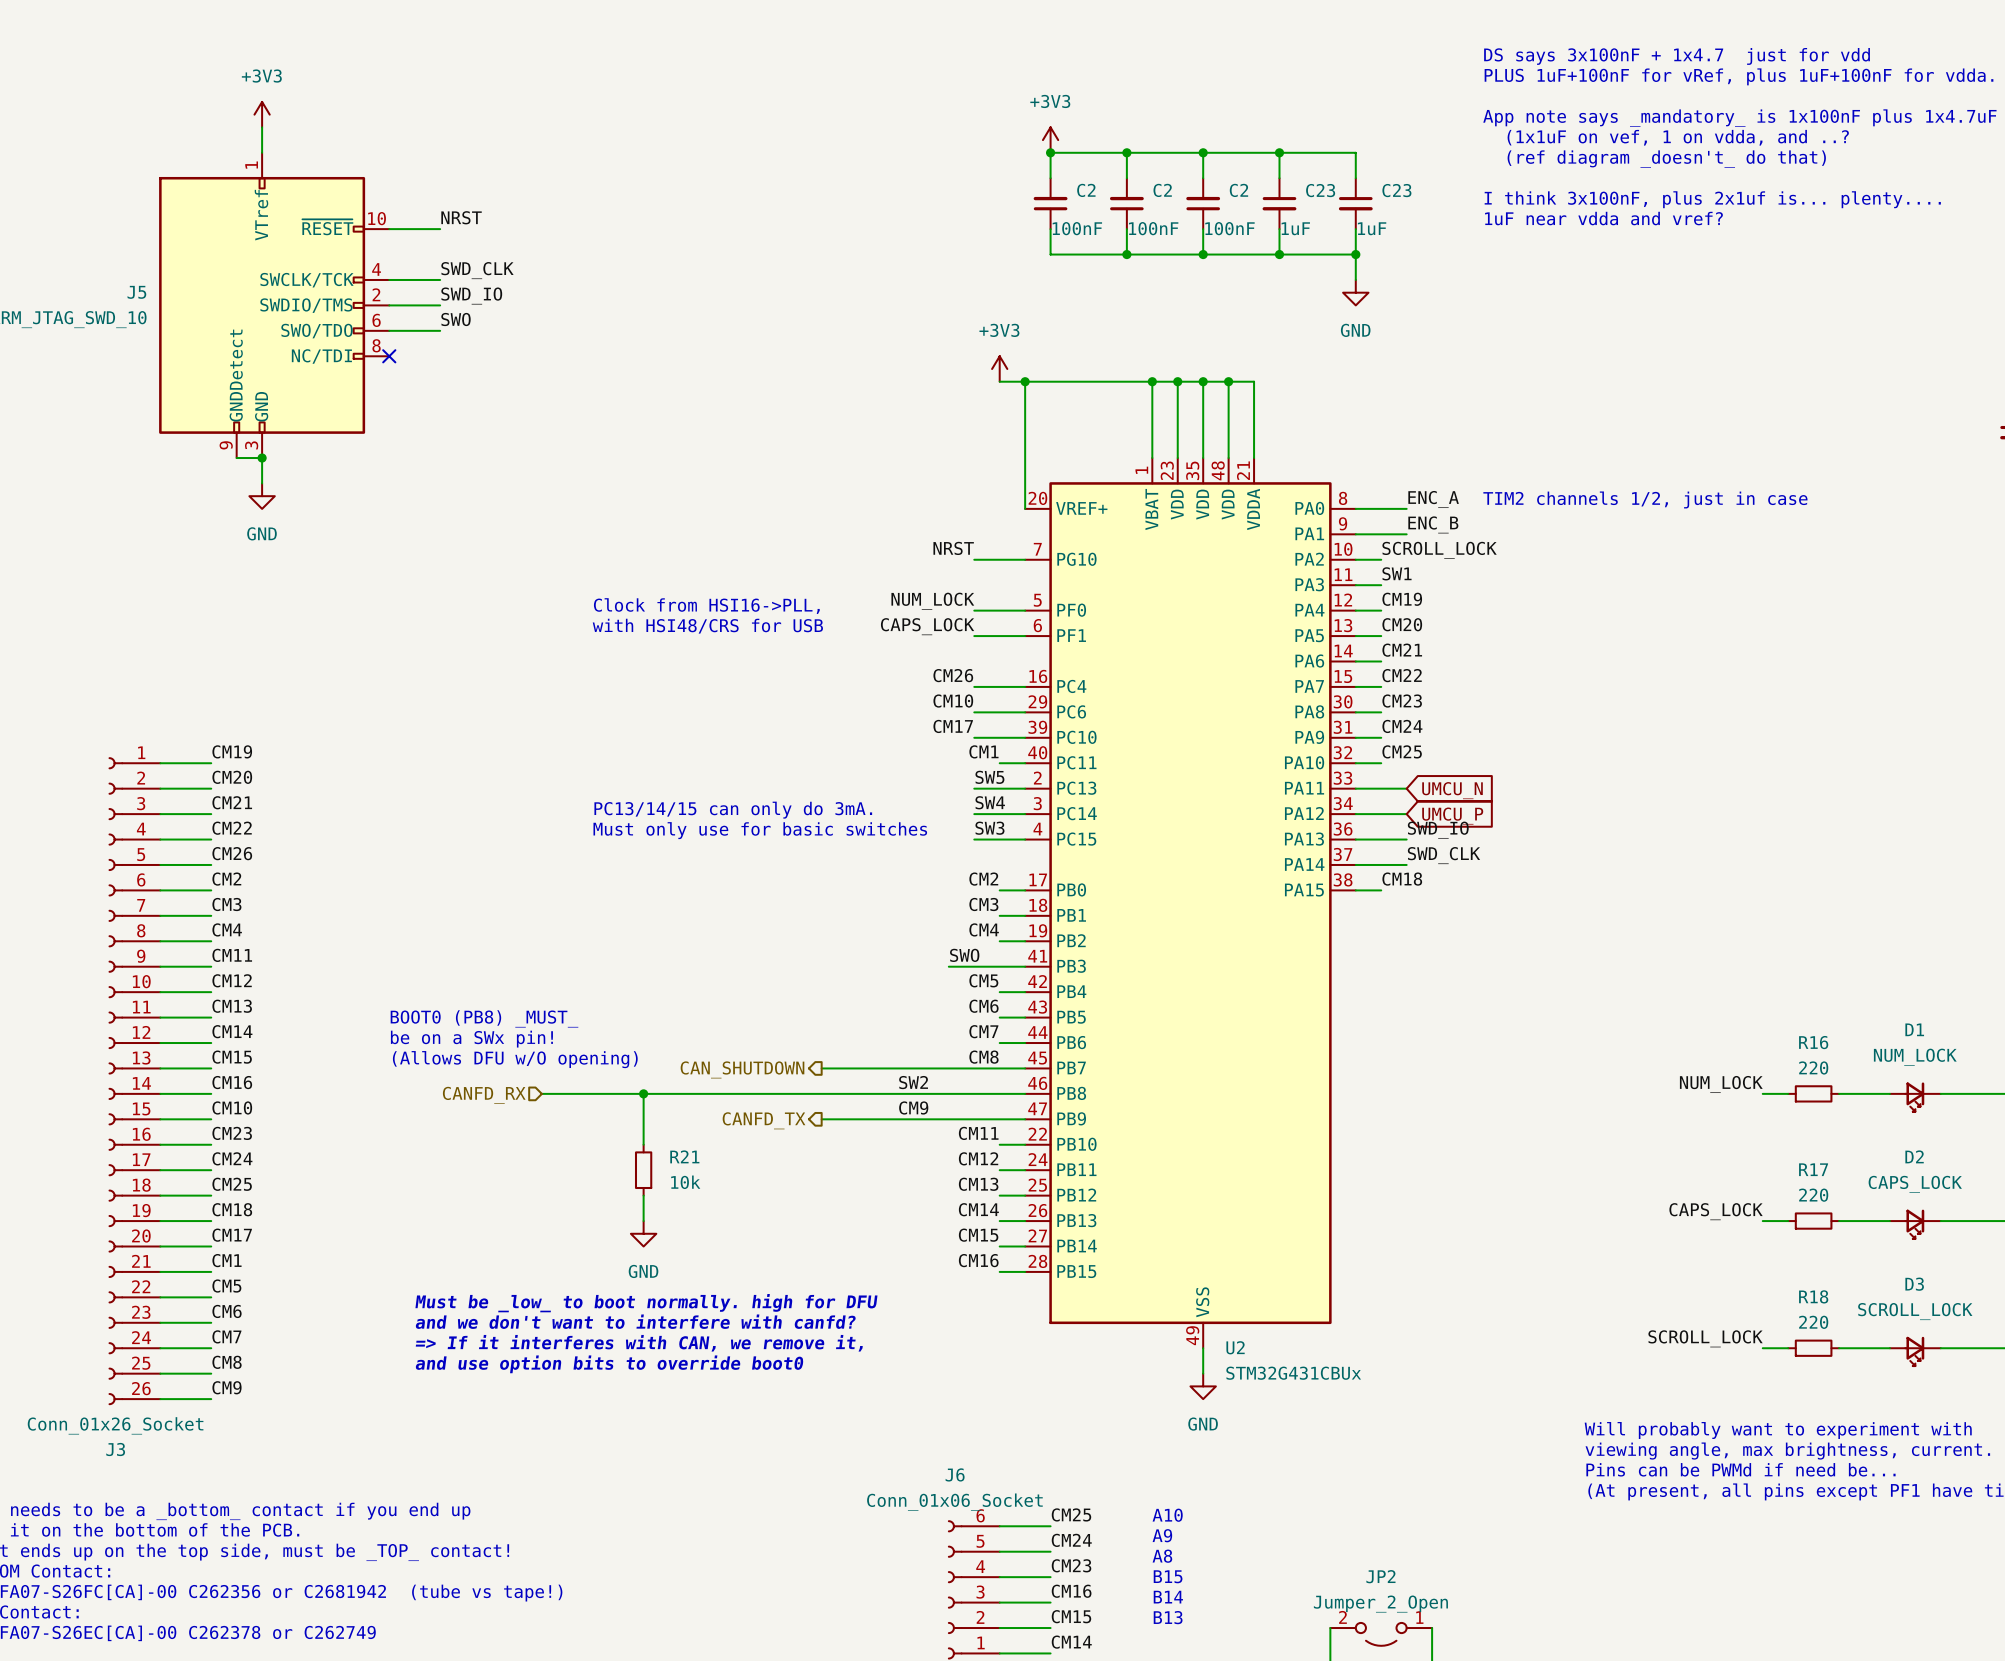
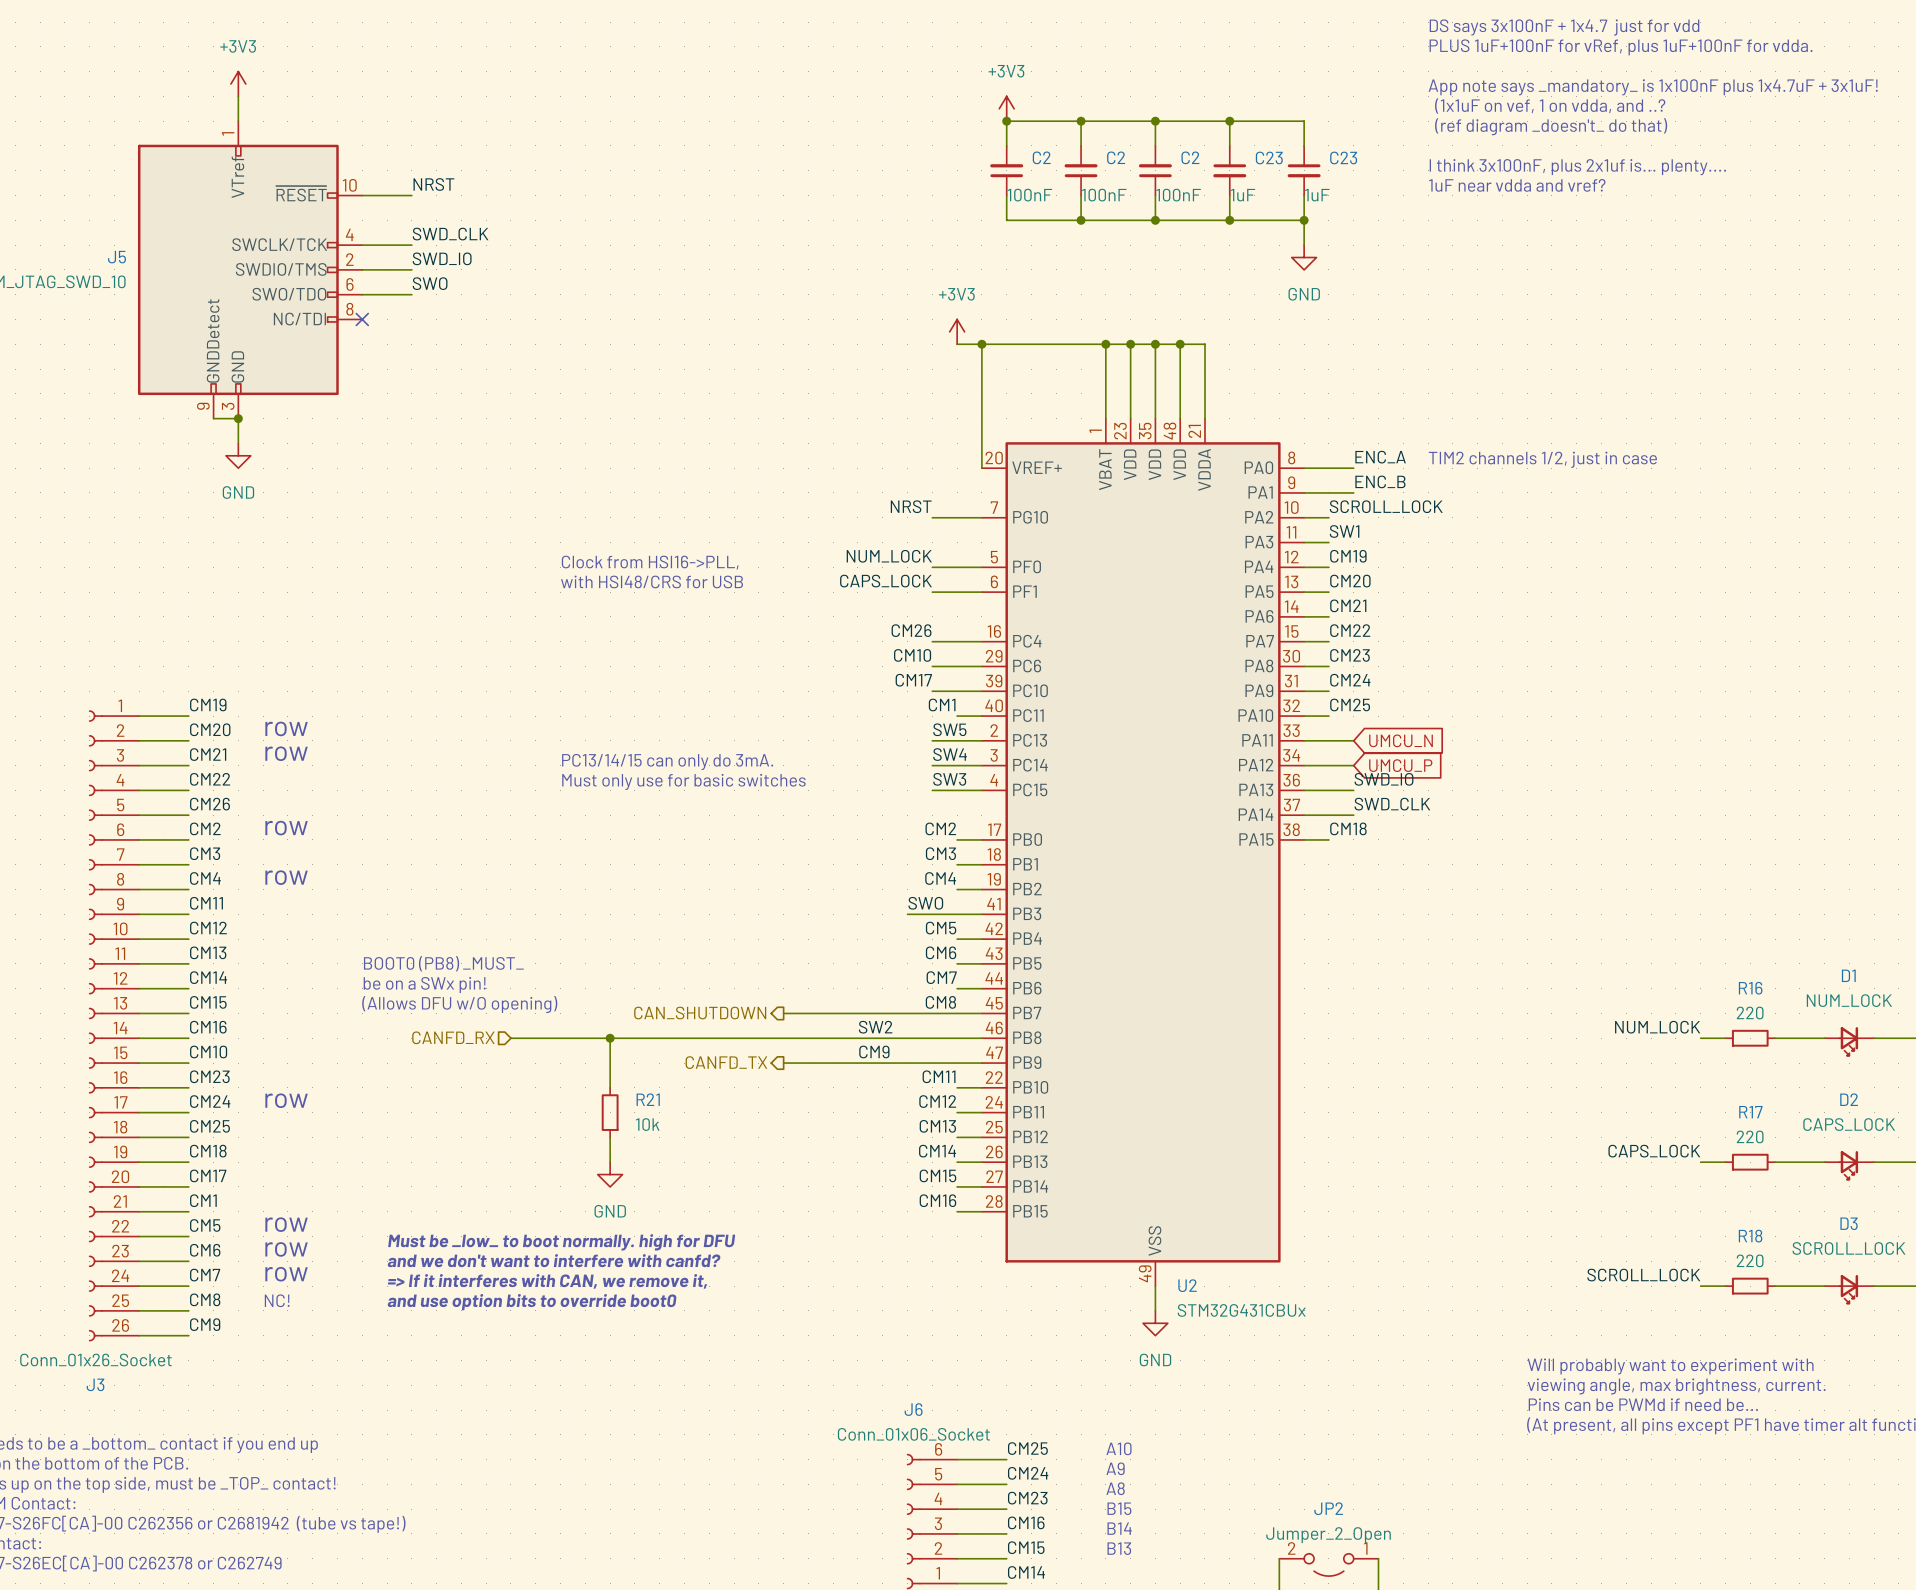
text: none -> row (286, 728)
text: none -> row (286, 753)
text: none -> row (286, 828)
text: none -> row (286, 877)
text: none -> row (286, 1100)
text: none -> row (286, 1224)
text: none -> row (286, 1249)
text: none -> row (286, 1274)
text: none -> NC! (277, 1300)

